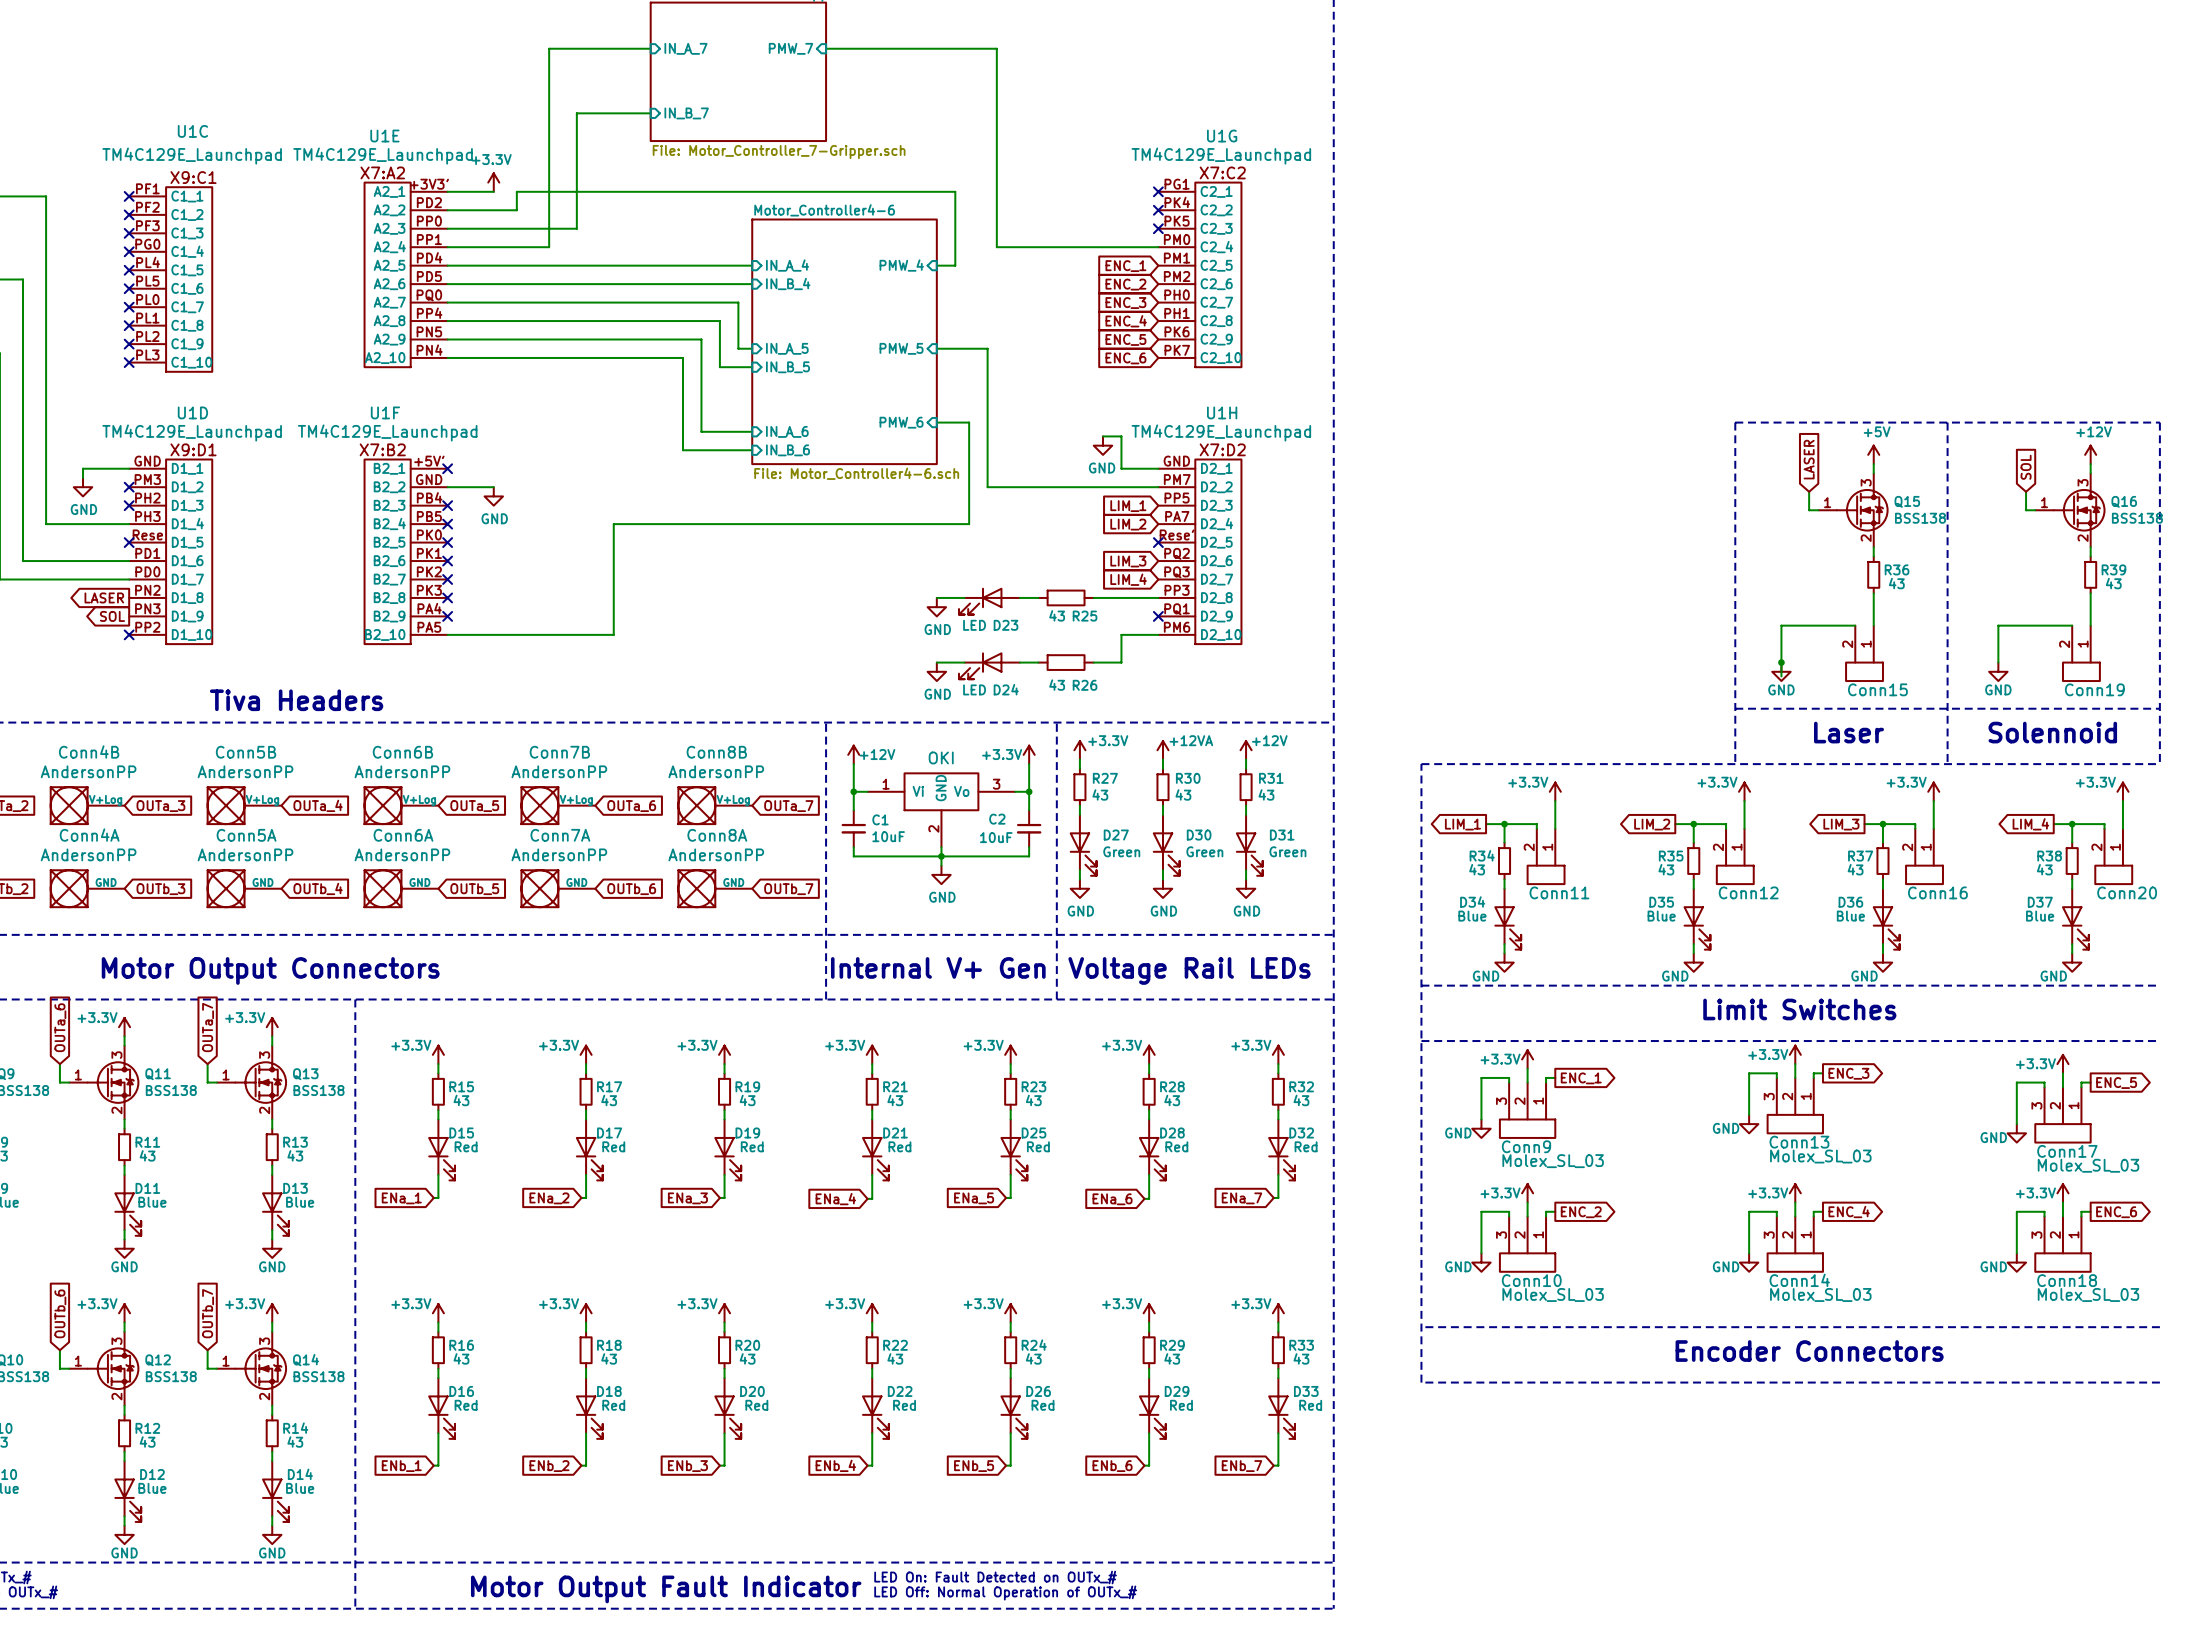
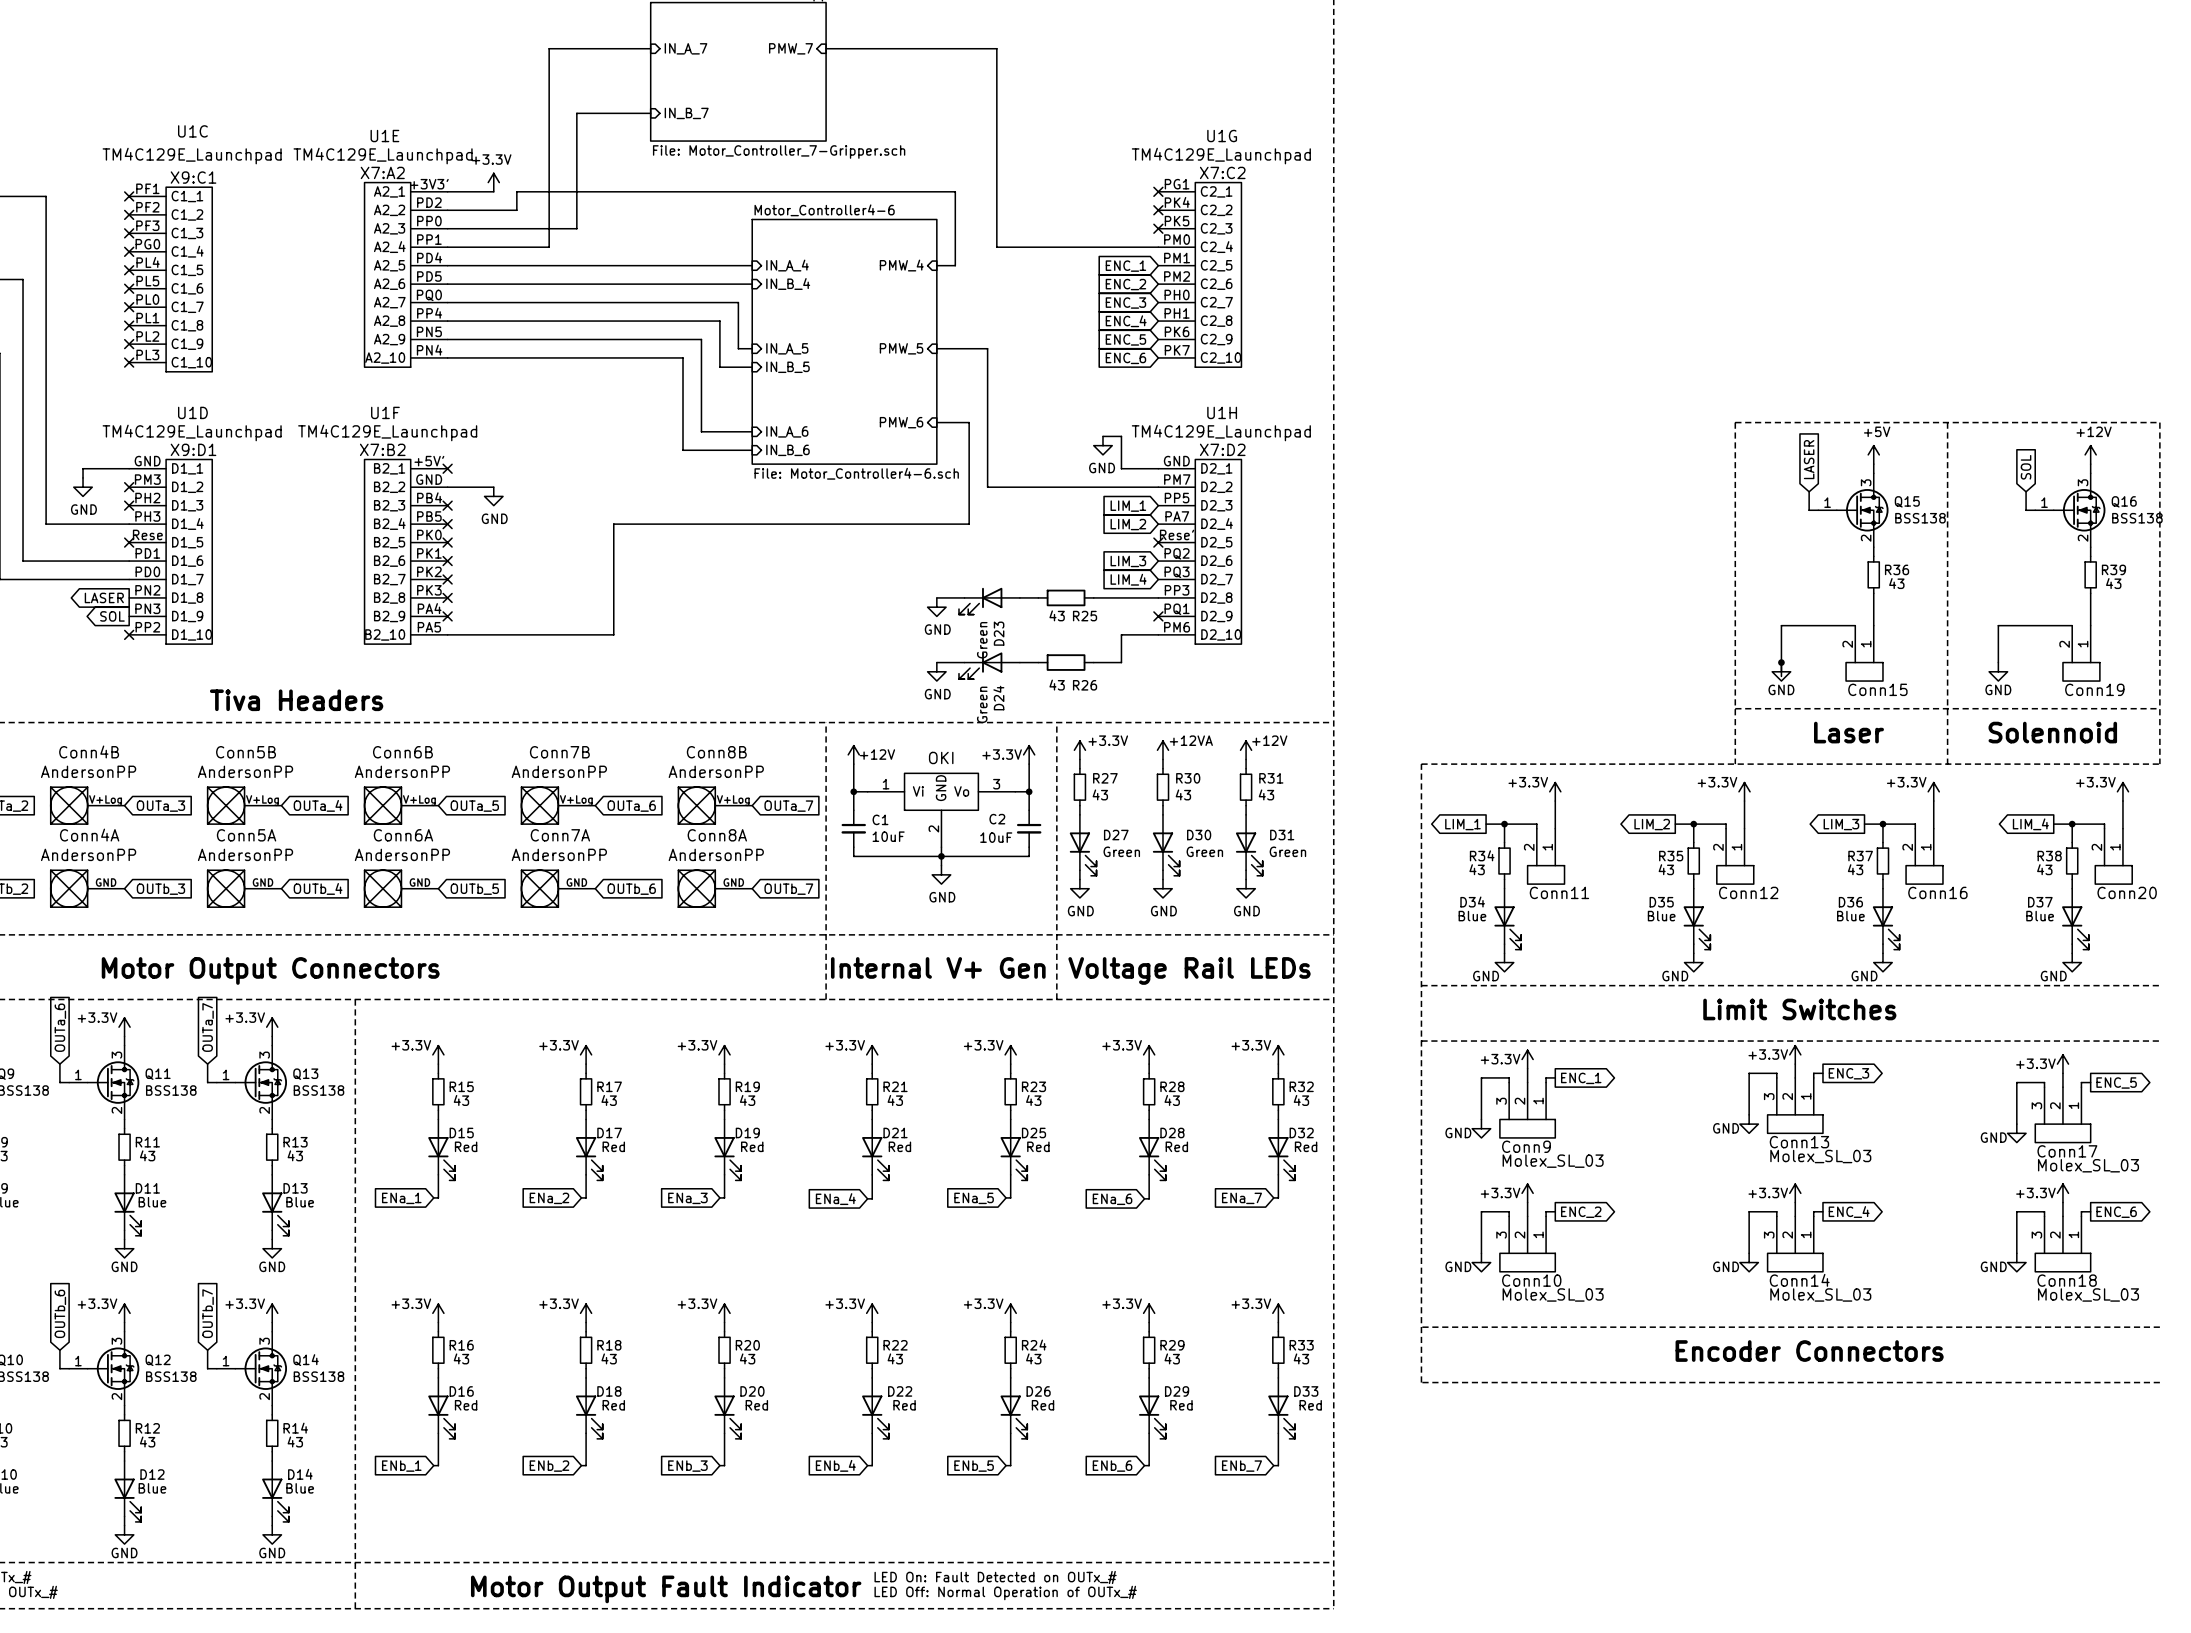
D23 value: LED (974, 625) -> Green (982, 640)
D23 name rotation: 0° (1006, 625) -> 90° counterclockwise (999, 633)
D24 value: LED (974, 689) -> Green (982, 704)
D24 name rotation: 0° (1006, 689) -> 90° counterclockwise (998, 698)

